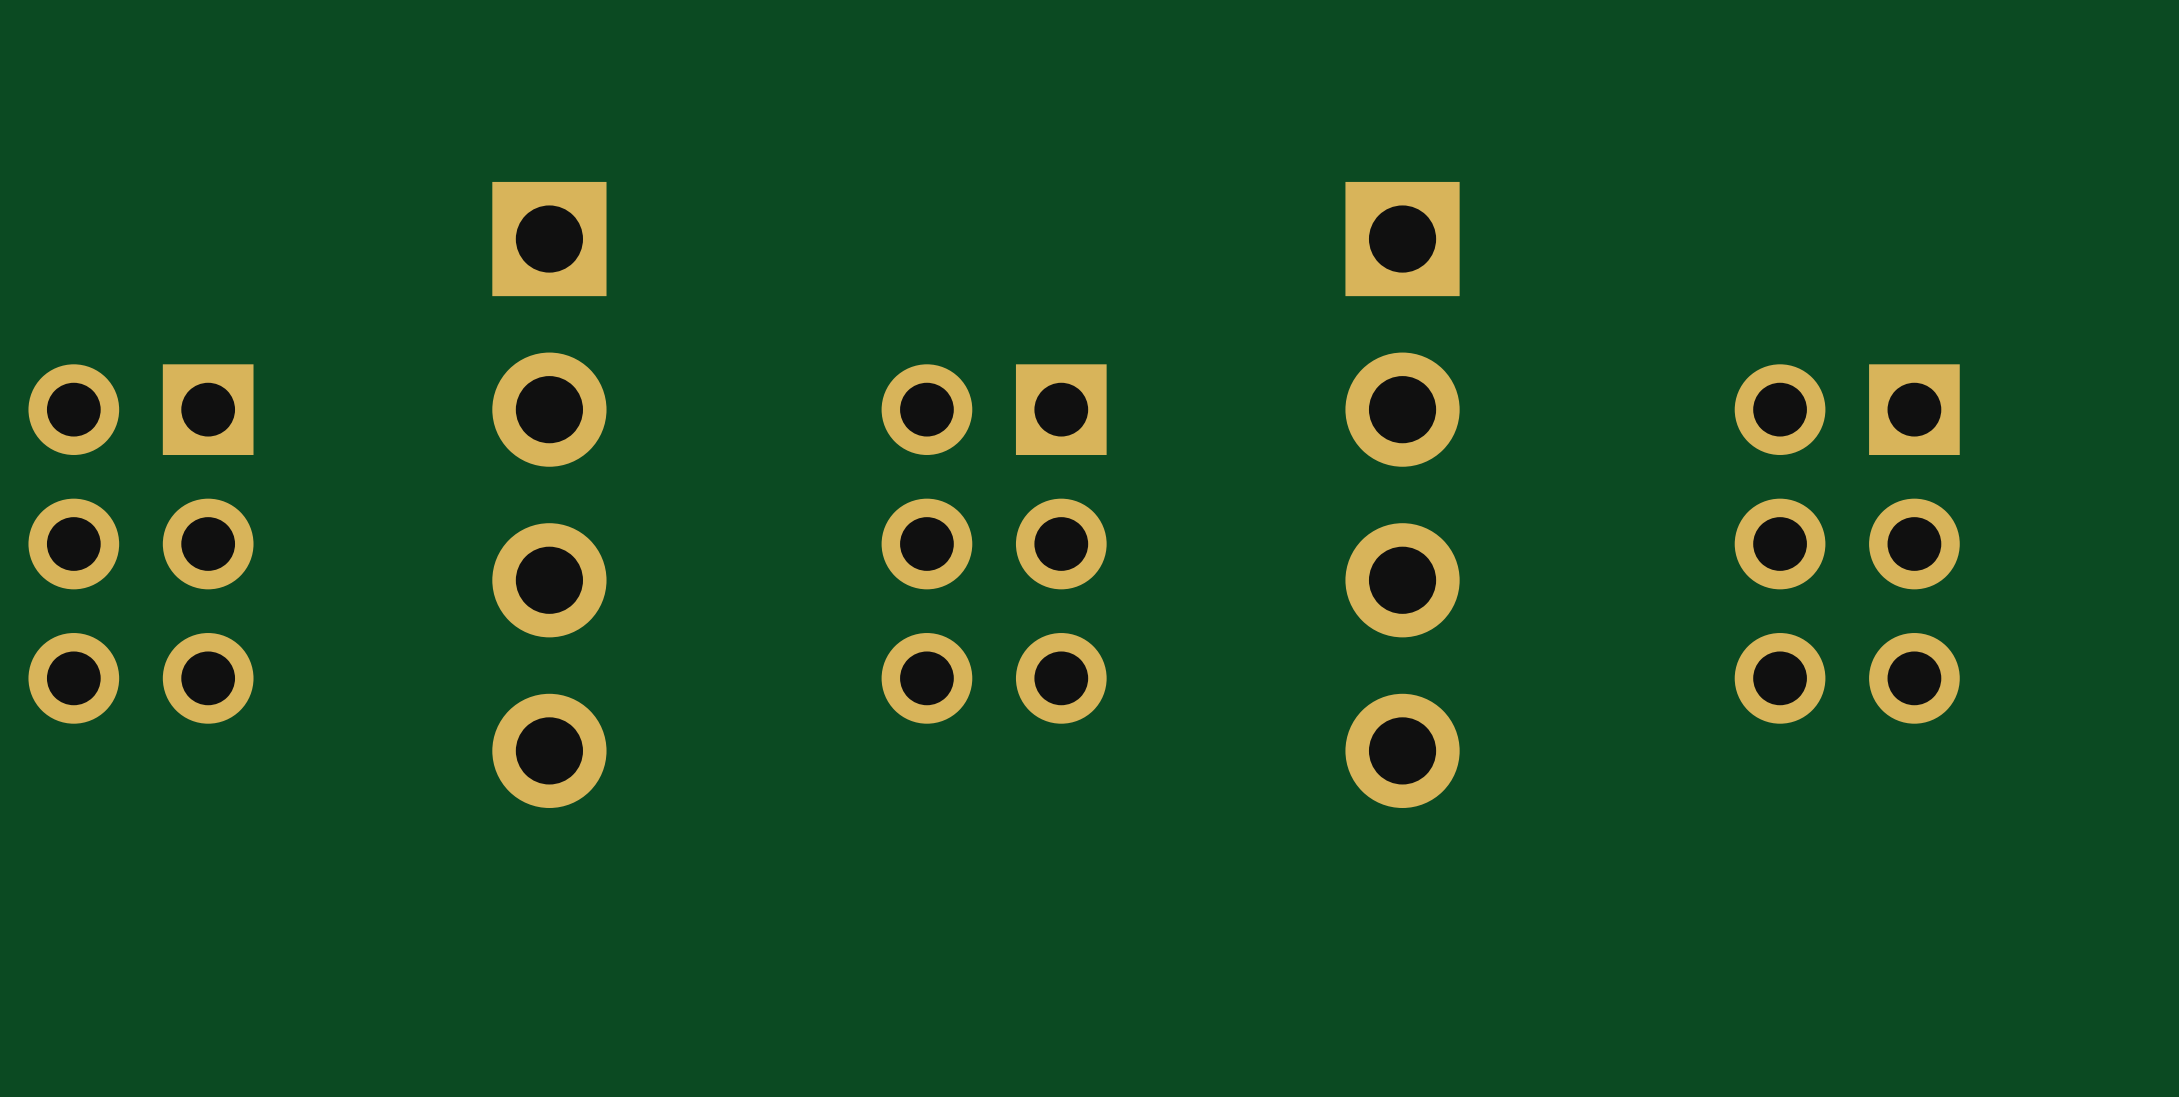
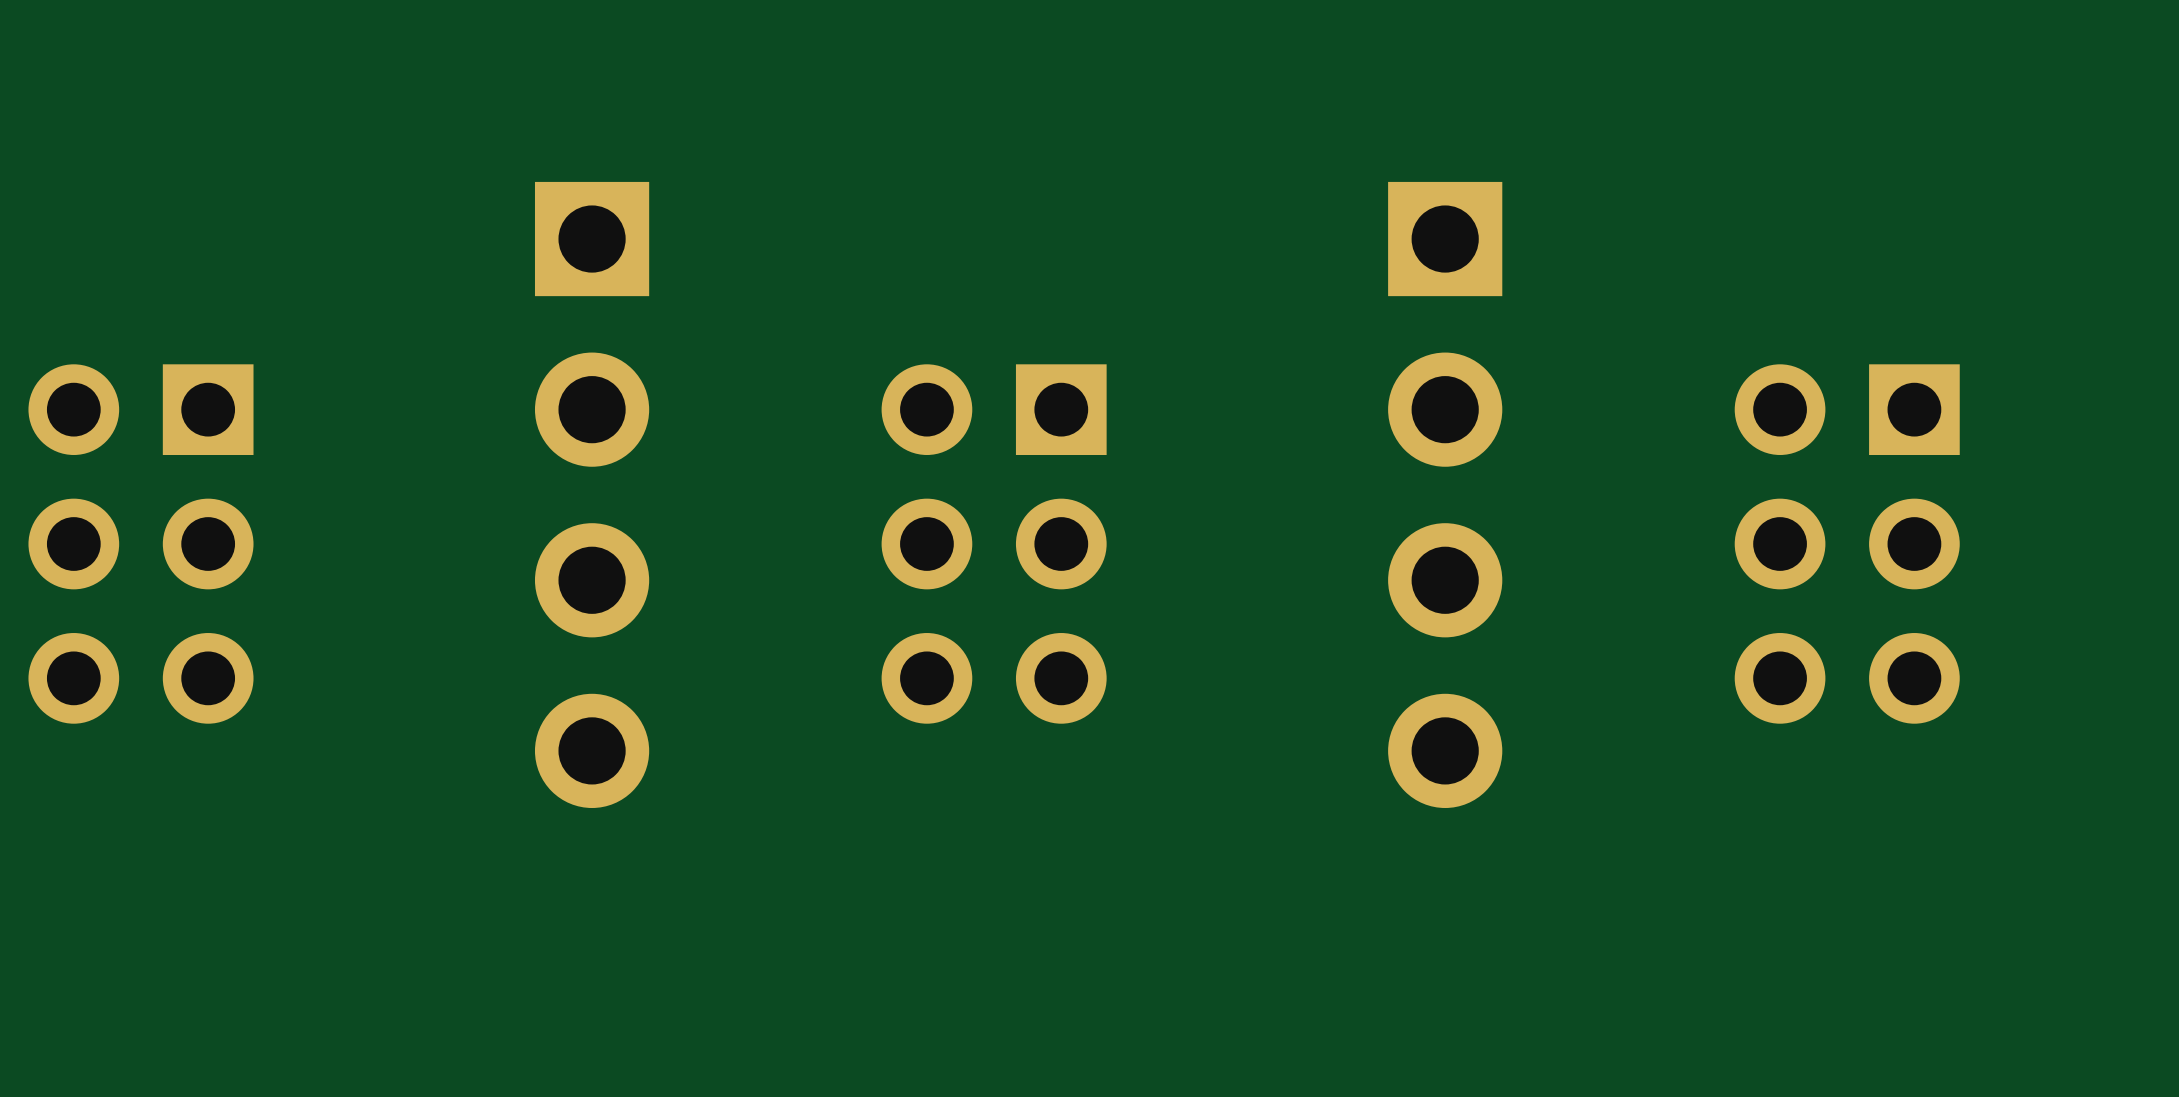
part position: (549, 494) -> (592, 494)
part position: (1402, 494) -> (1445, 494)

